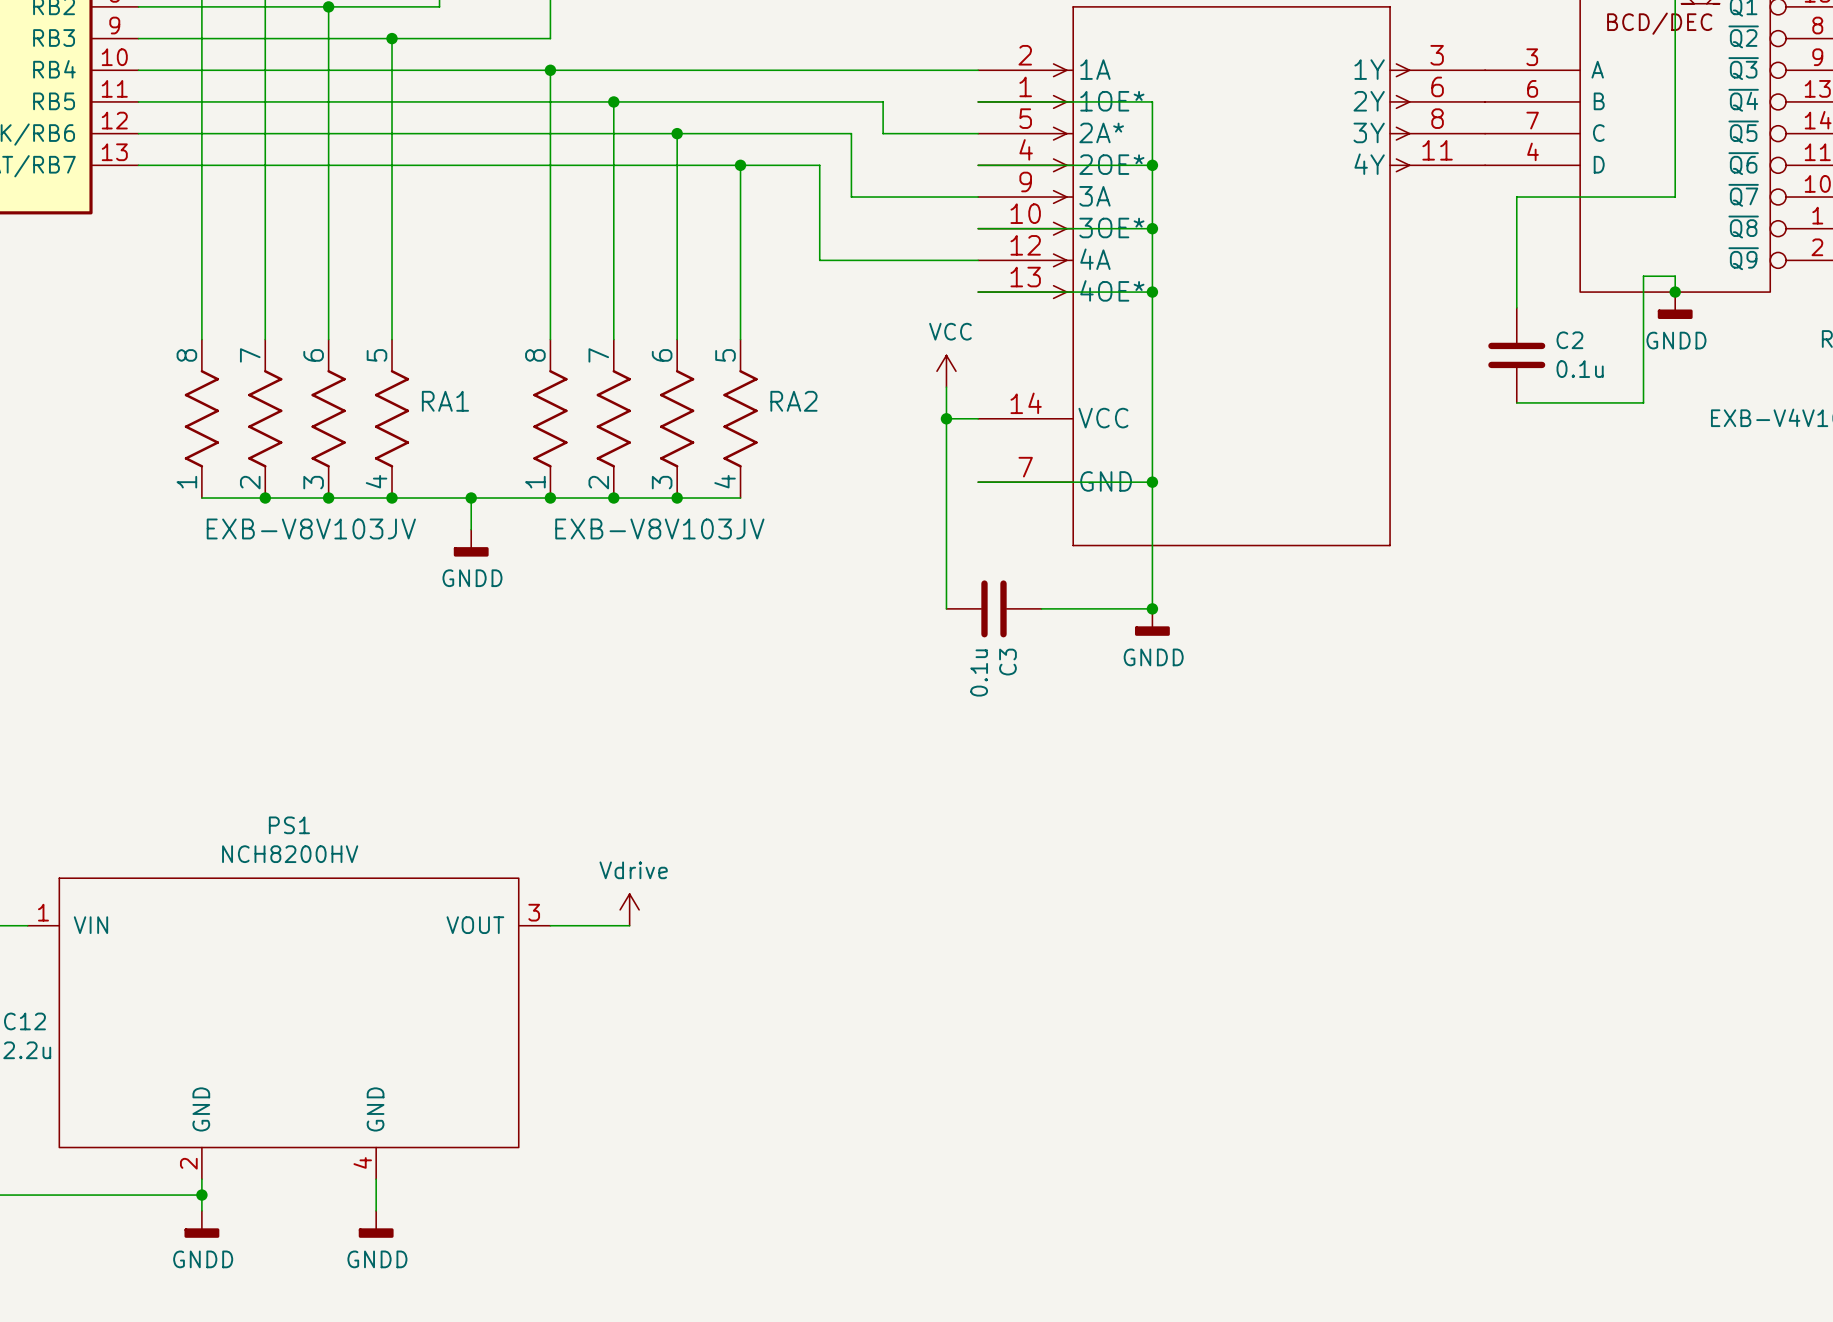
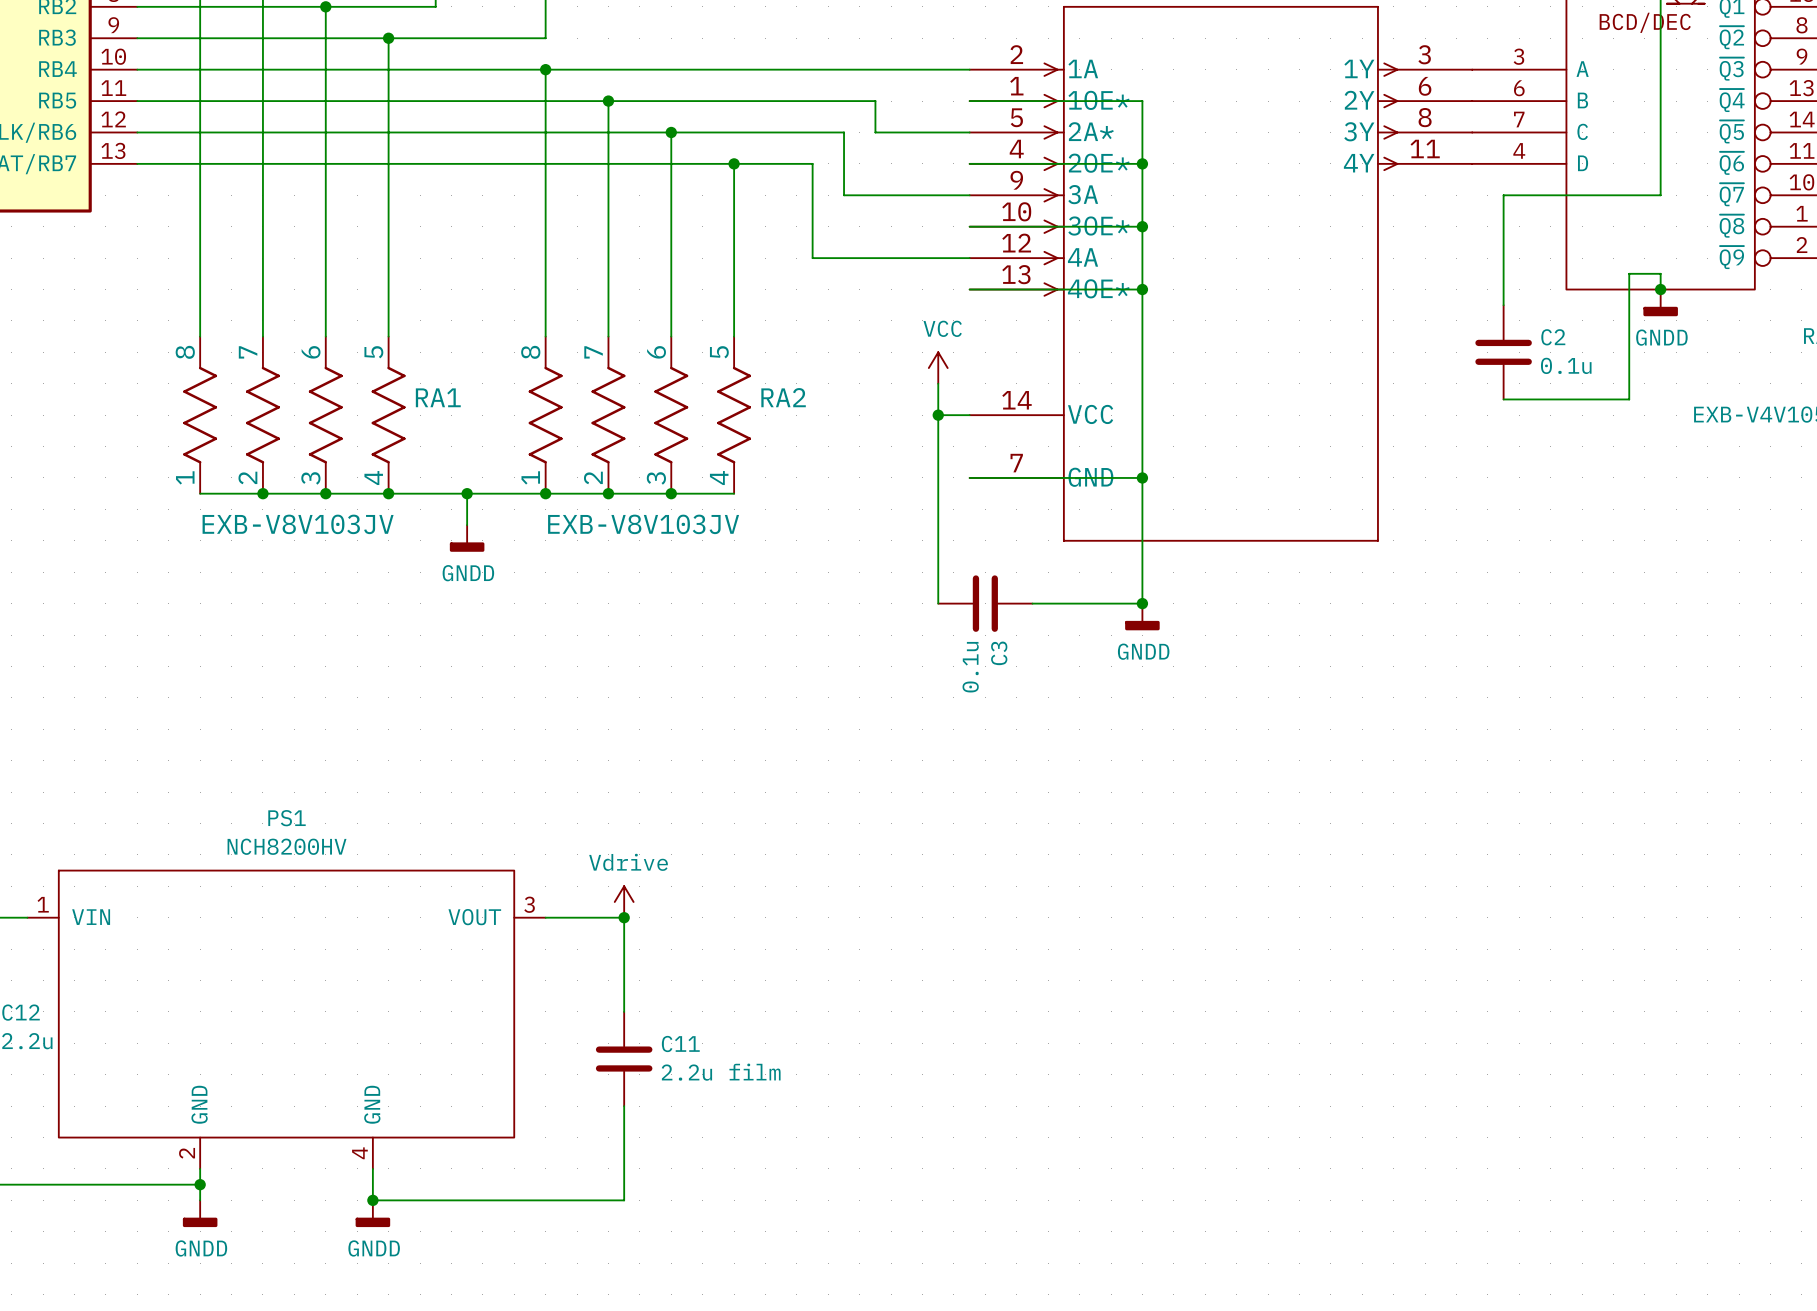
wire: none -> (624, 917) (624, 1011)
junction: none -> (624, 917)
C11: none -> 2.2u film (624, 1059)
wire: none -> (624, 1106) (624, 1200) (372, 1200)
junction: none -> (372, 1200)

